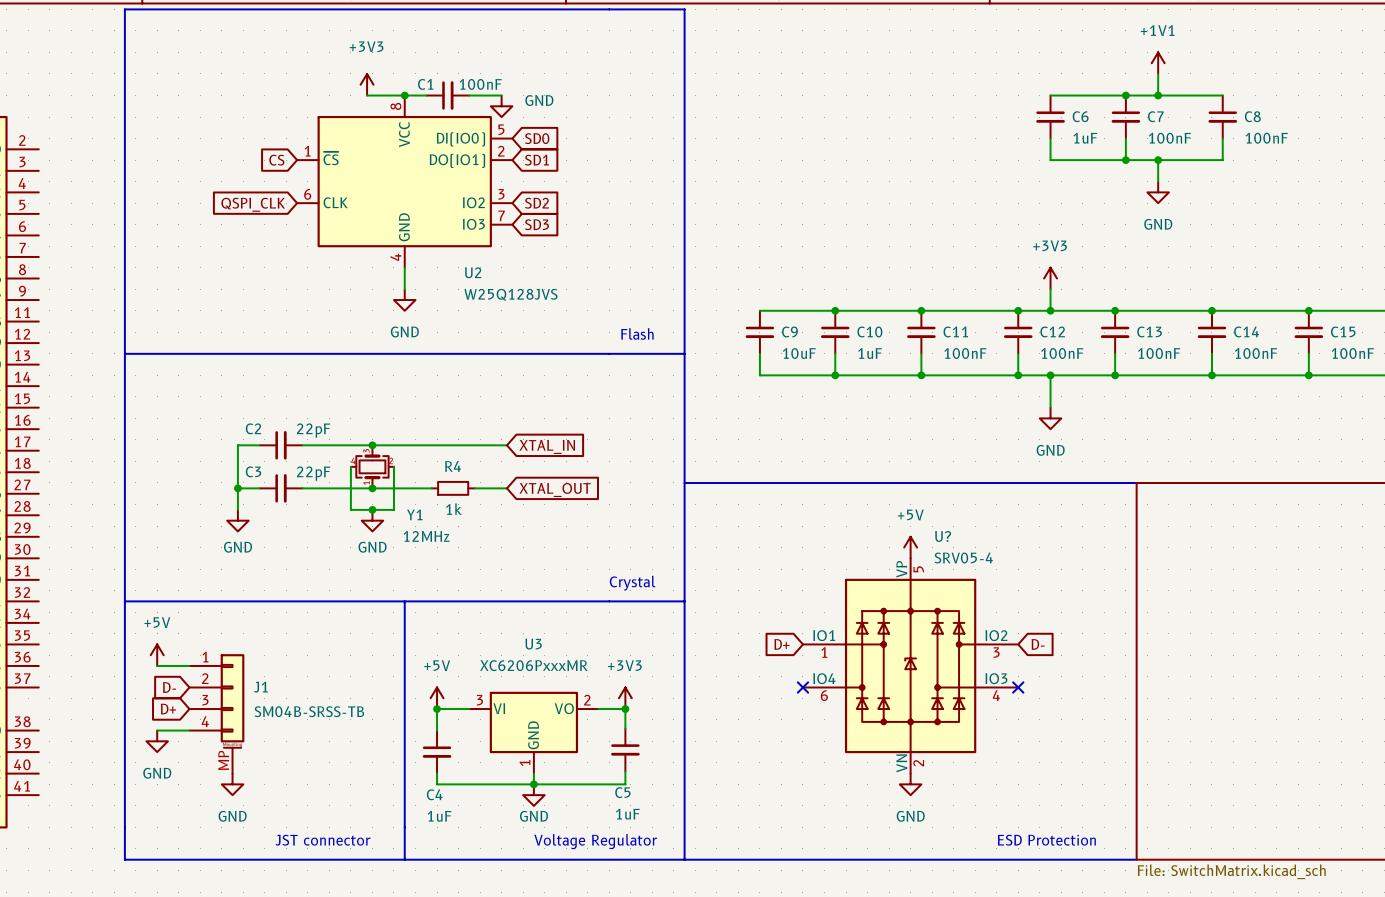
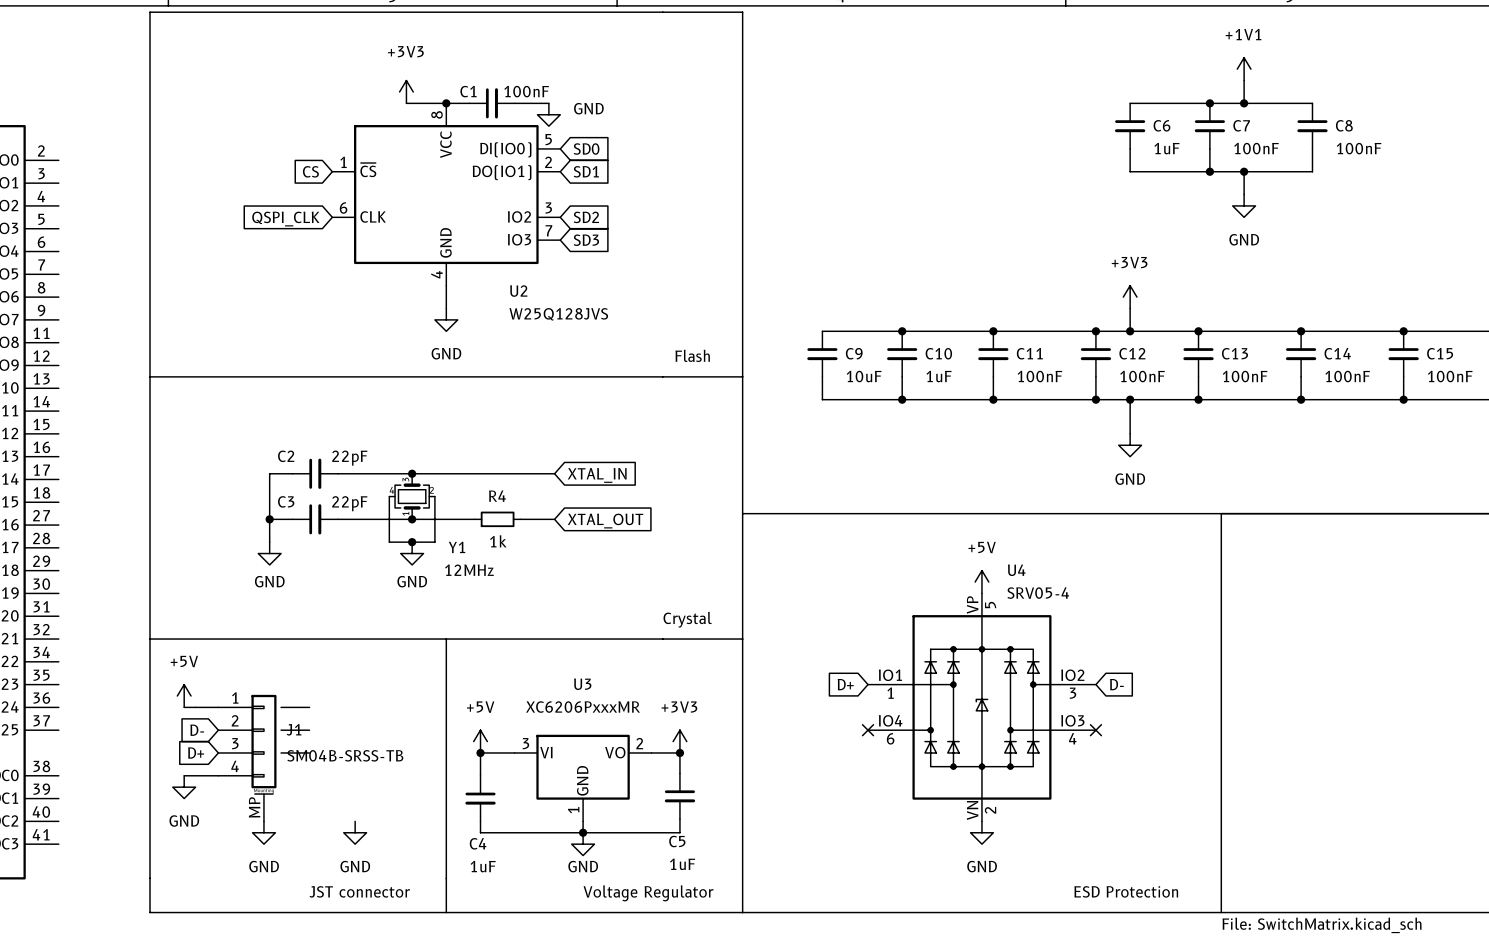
U? name: U? (943, 536) -> U4 (1016, 570)
wire: none -> (281, 707) (309, 707)
wire: none -> (281, 730) (309, 730)
wire: none -> (281, 752) (309, 752)
power symbol: none -> GND (355, 832)

